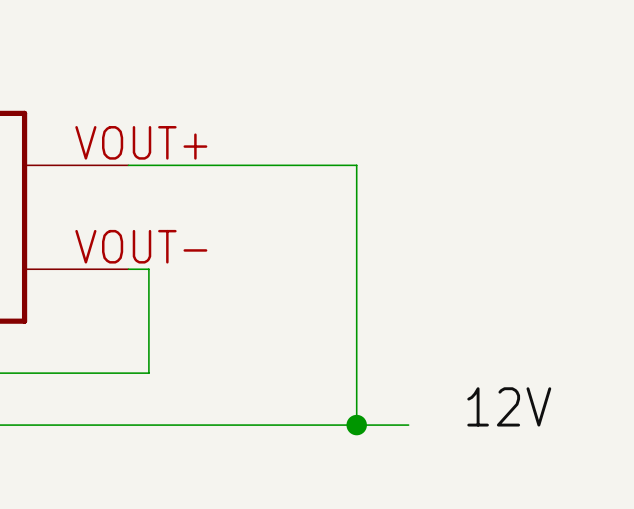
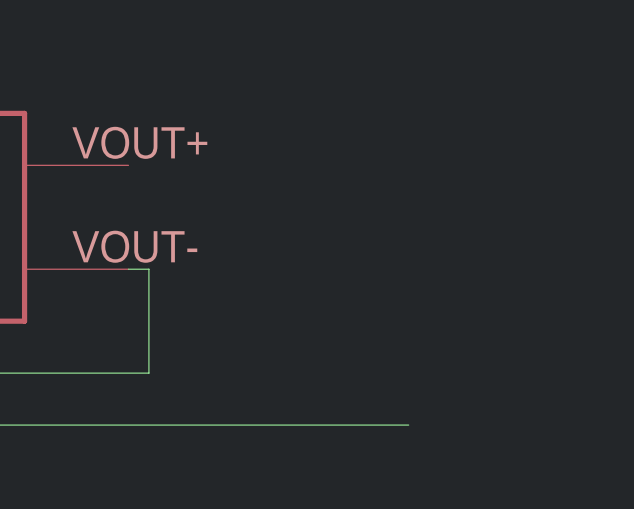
wire: (128, 165) (356, 165) (356, 425) -> none
label: 12V (509, 406) -> none
junction: (356, 425) -> none

